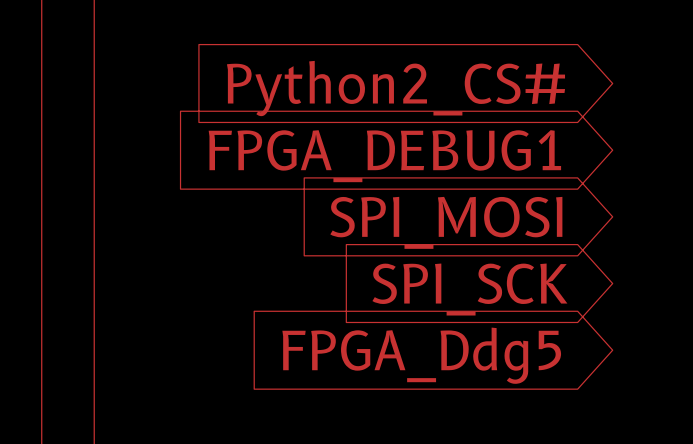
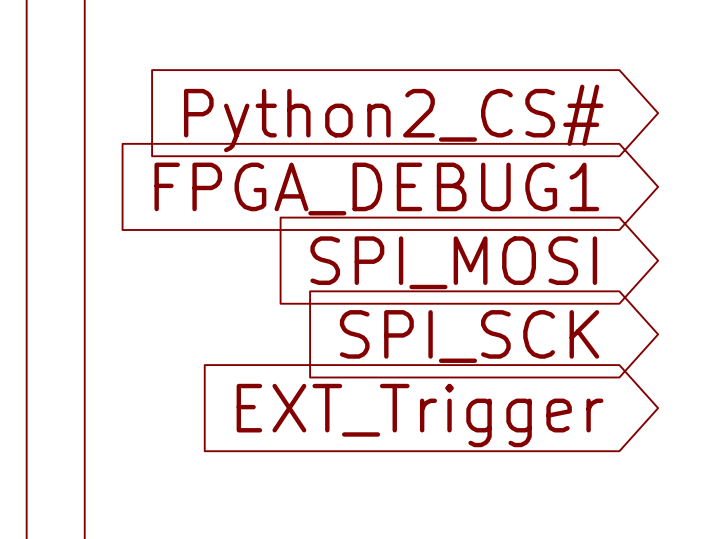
global label: FPGA_Ddg5 (421, 355) -> EXT_Trigger (420, 415)

